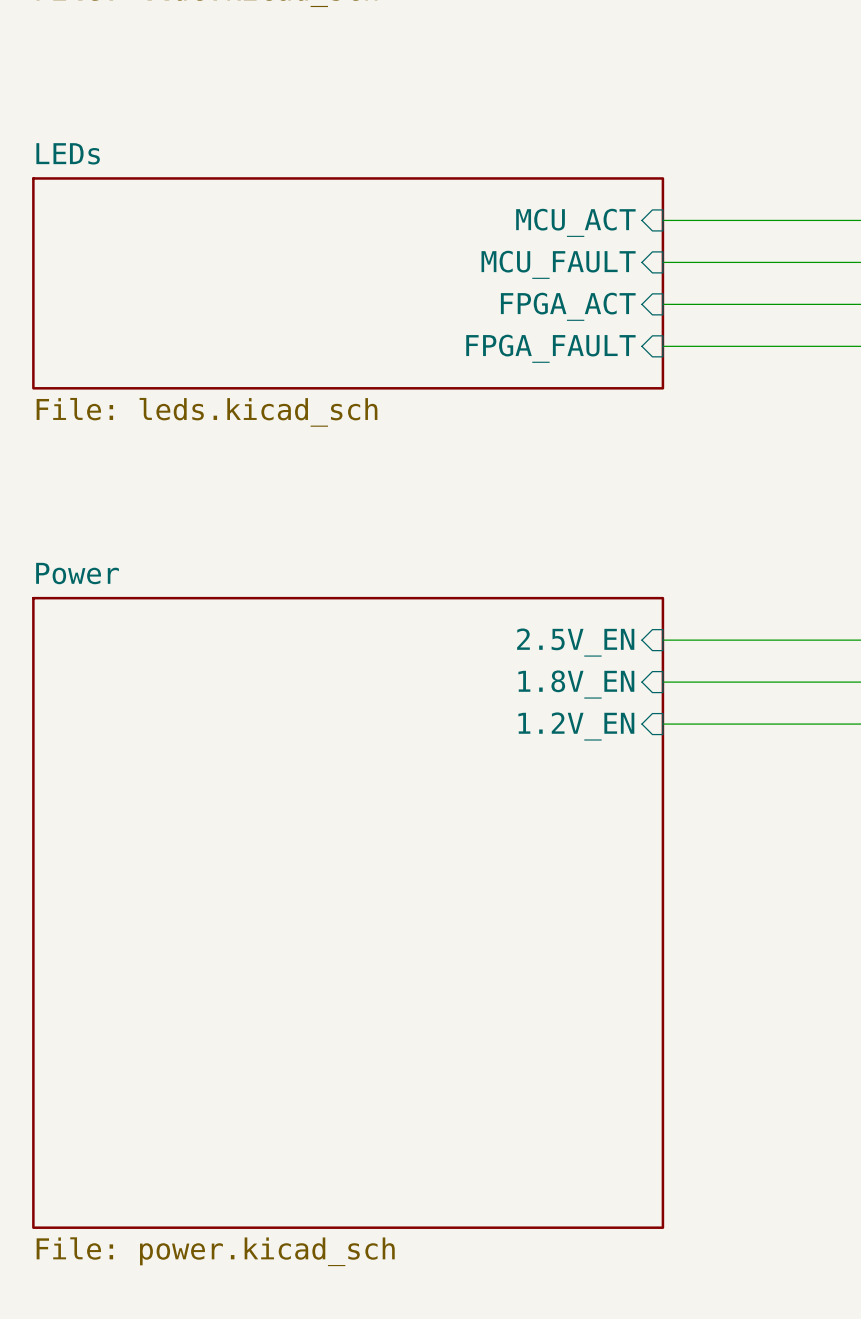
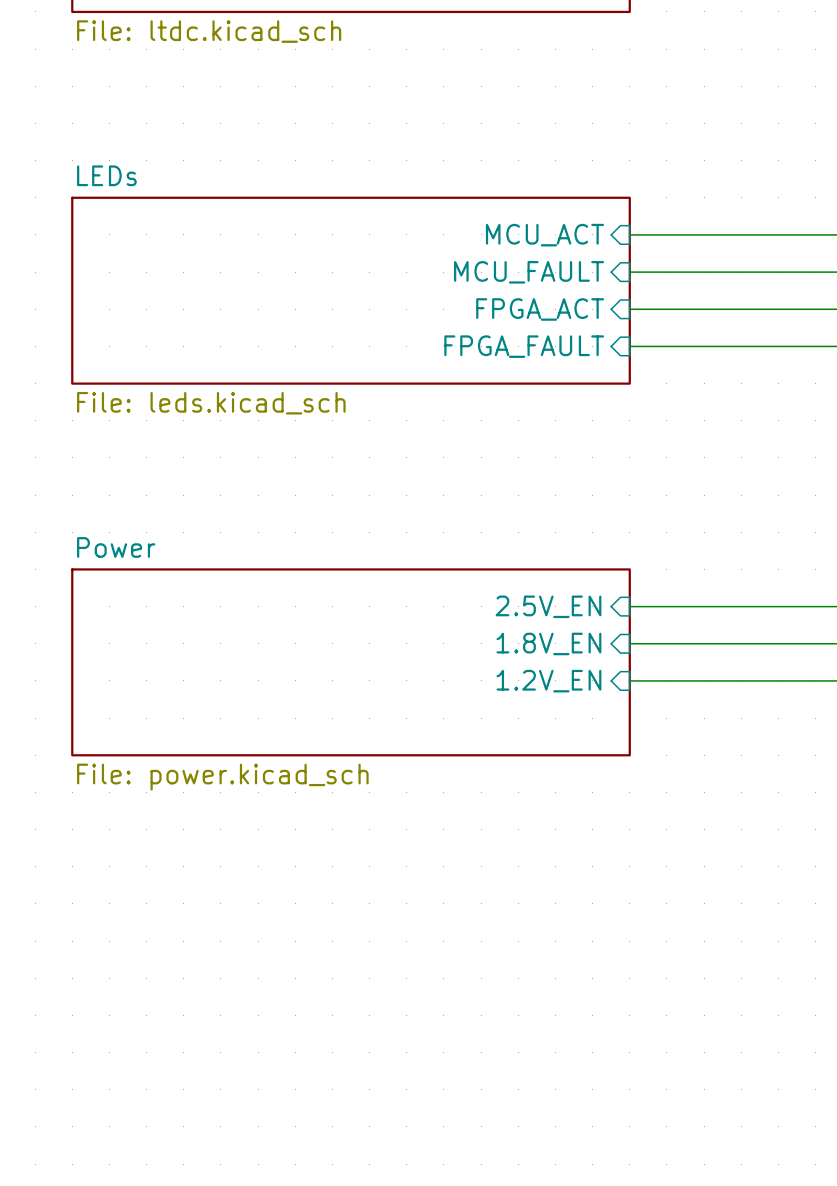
sheet Power: none -> File: power.kicad_sch (351, 662)
sheet Power: File: power.kicad_sch (348, 912) -> none

